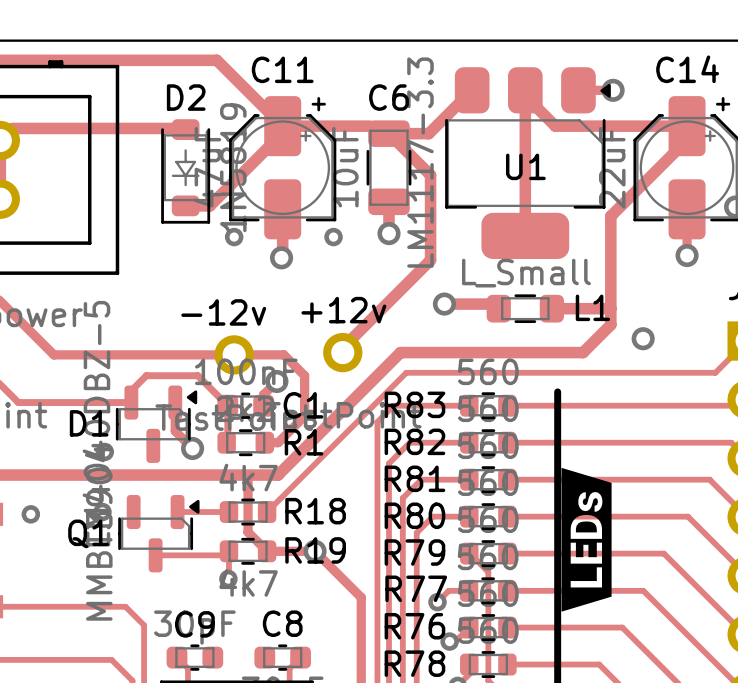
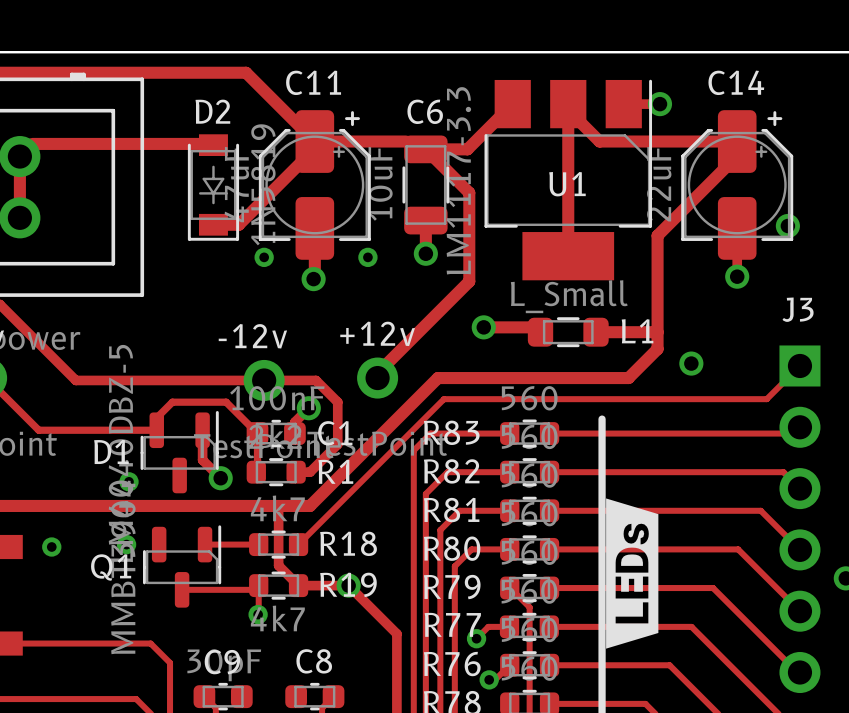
U1 footprint: [445, 67, 611, 260] -> [484, 79, 653, 281]
D2 footprint: [161, 119, 211, 224] -> [187, 134, 240, 241]
D1 footprint: [115, 385, 198, 463] -> [140, 410, 219, 494]
Q1 footprint: [118, 494, 200, 573] -> [142, 525, 222, 608]

